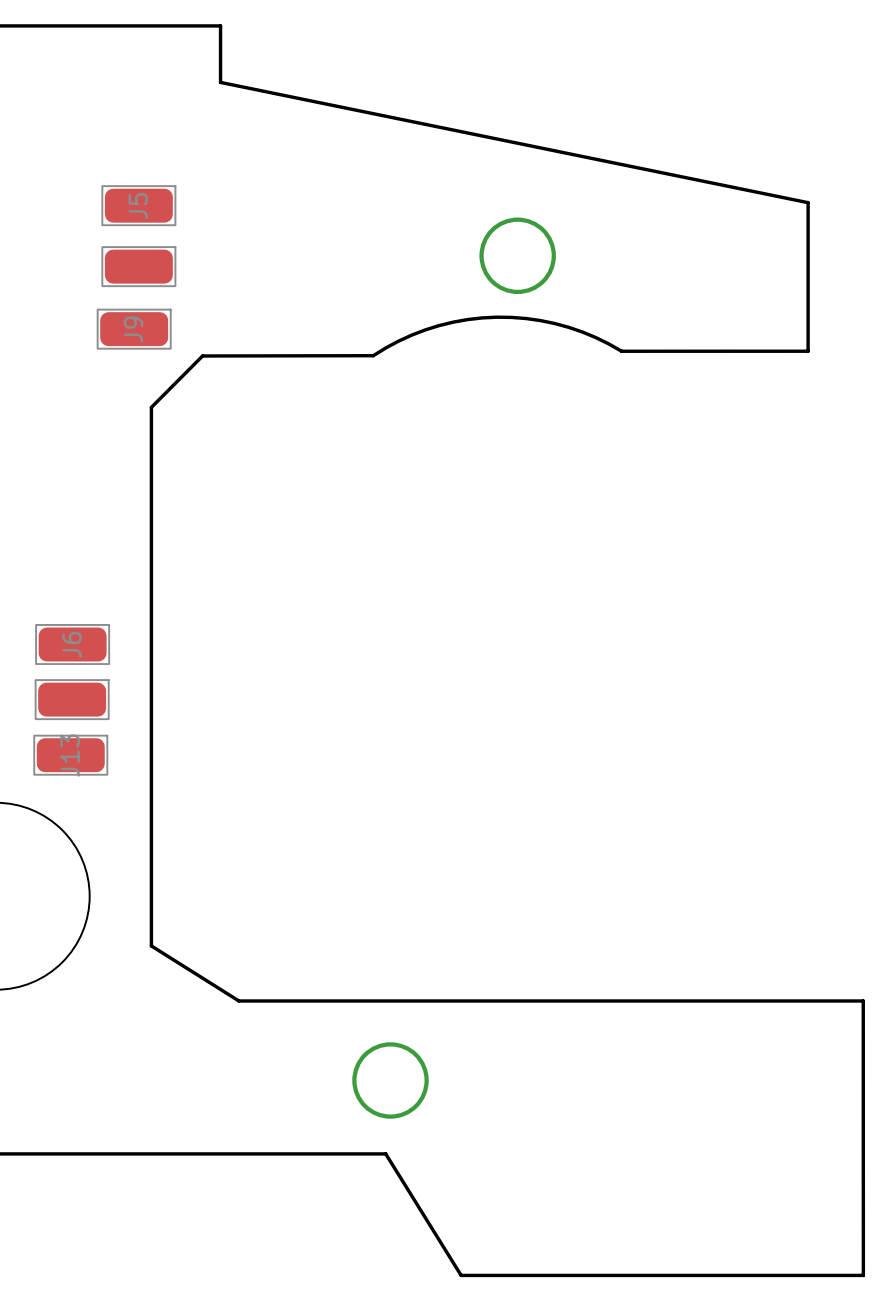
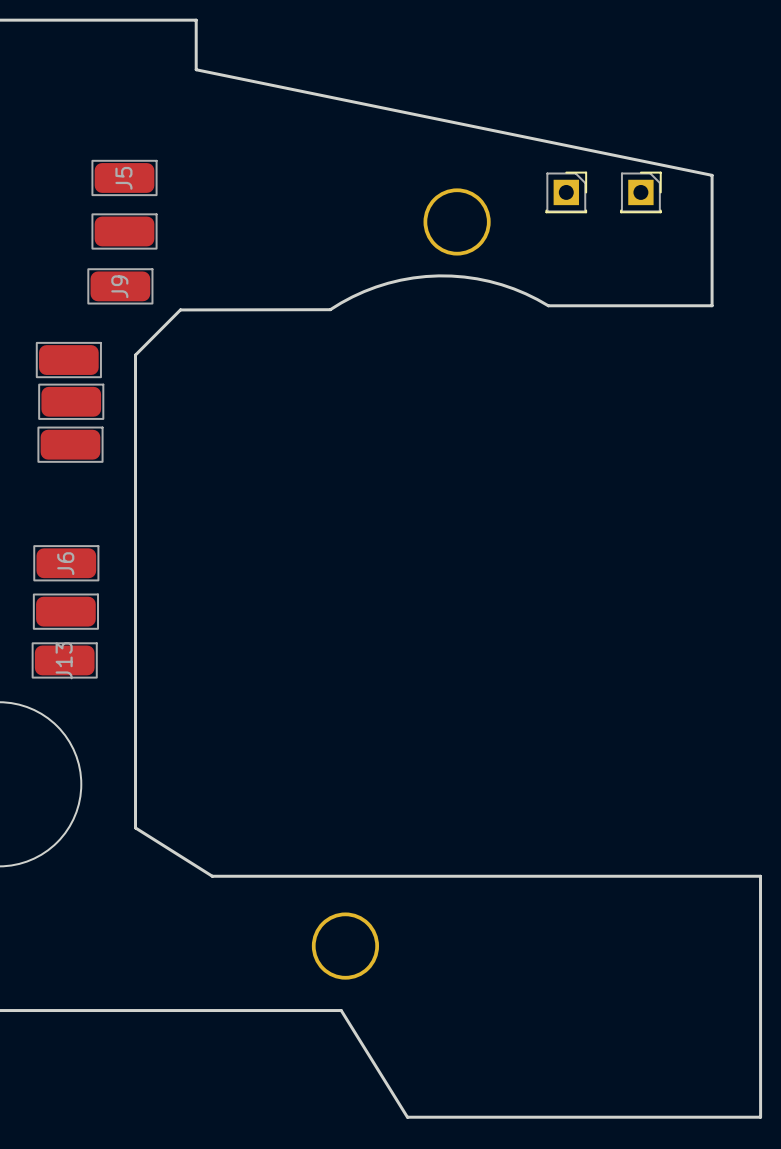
part: none -> (566, 192)
part: none -> (640, 192)
part: none -> (68, 360)
part: none -> (71, 401)
part: none -> (70, 444)

